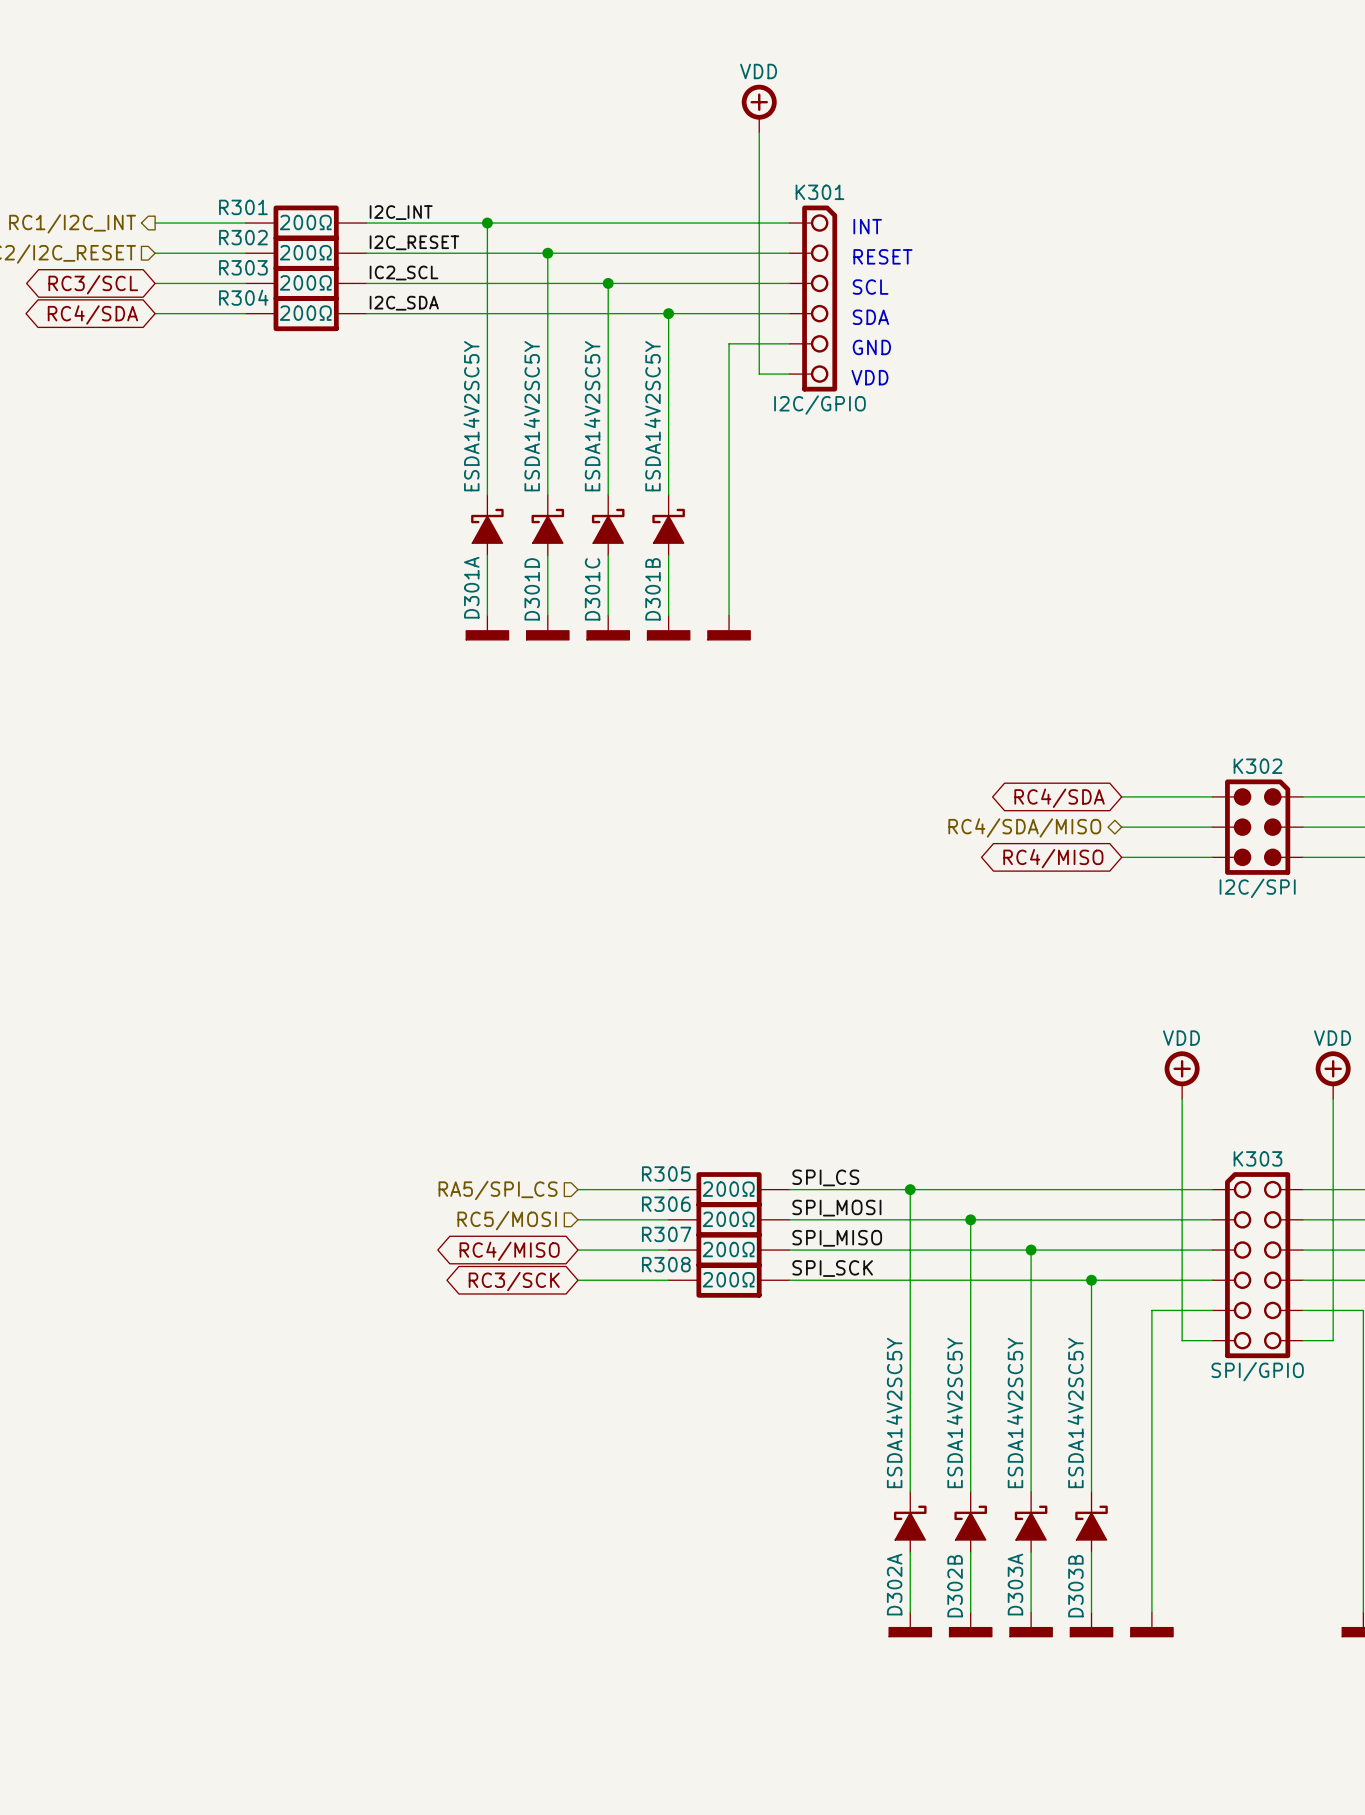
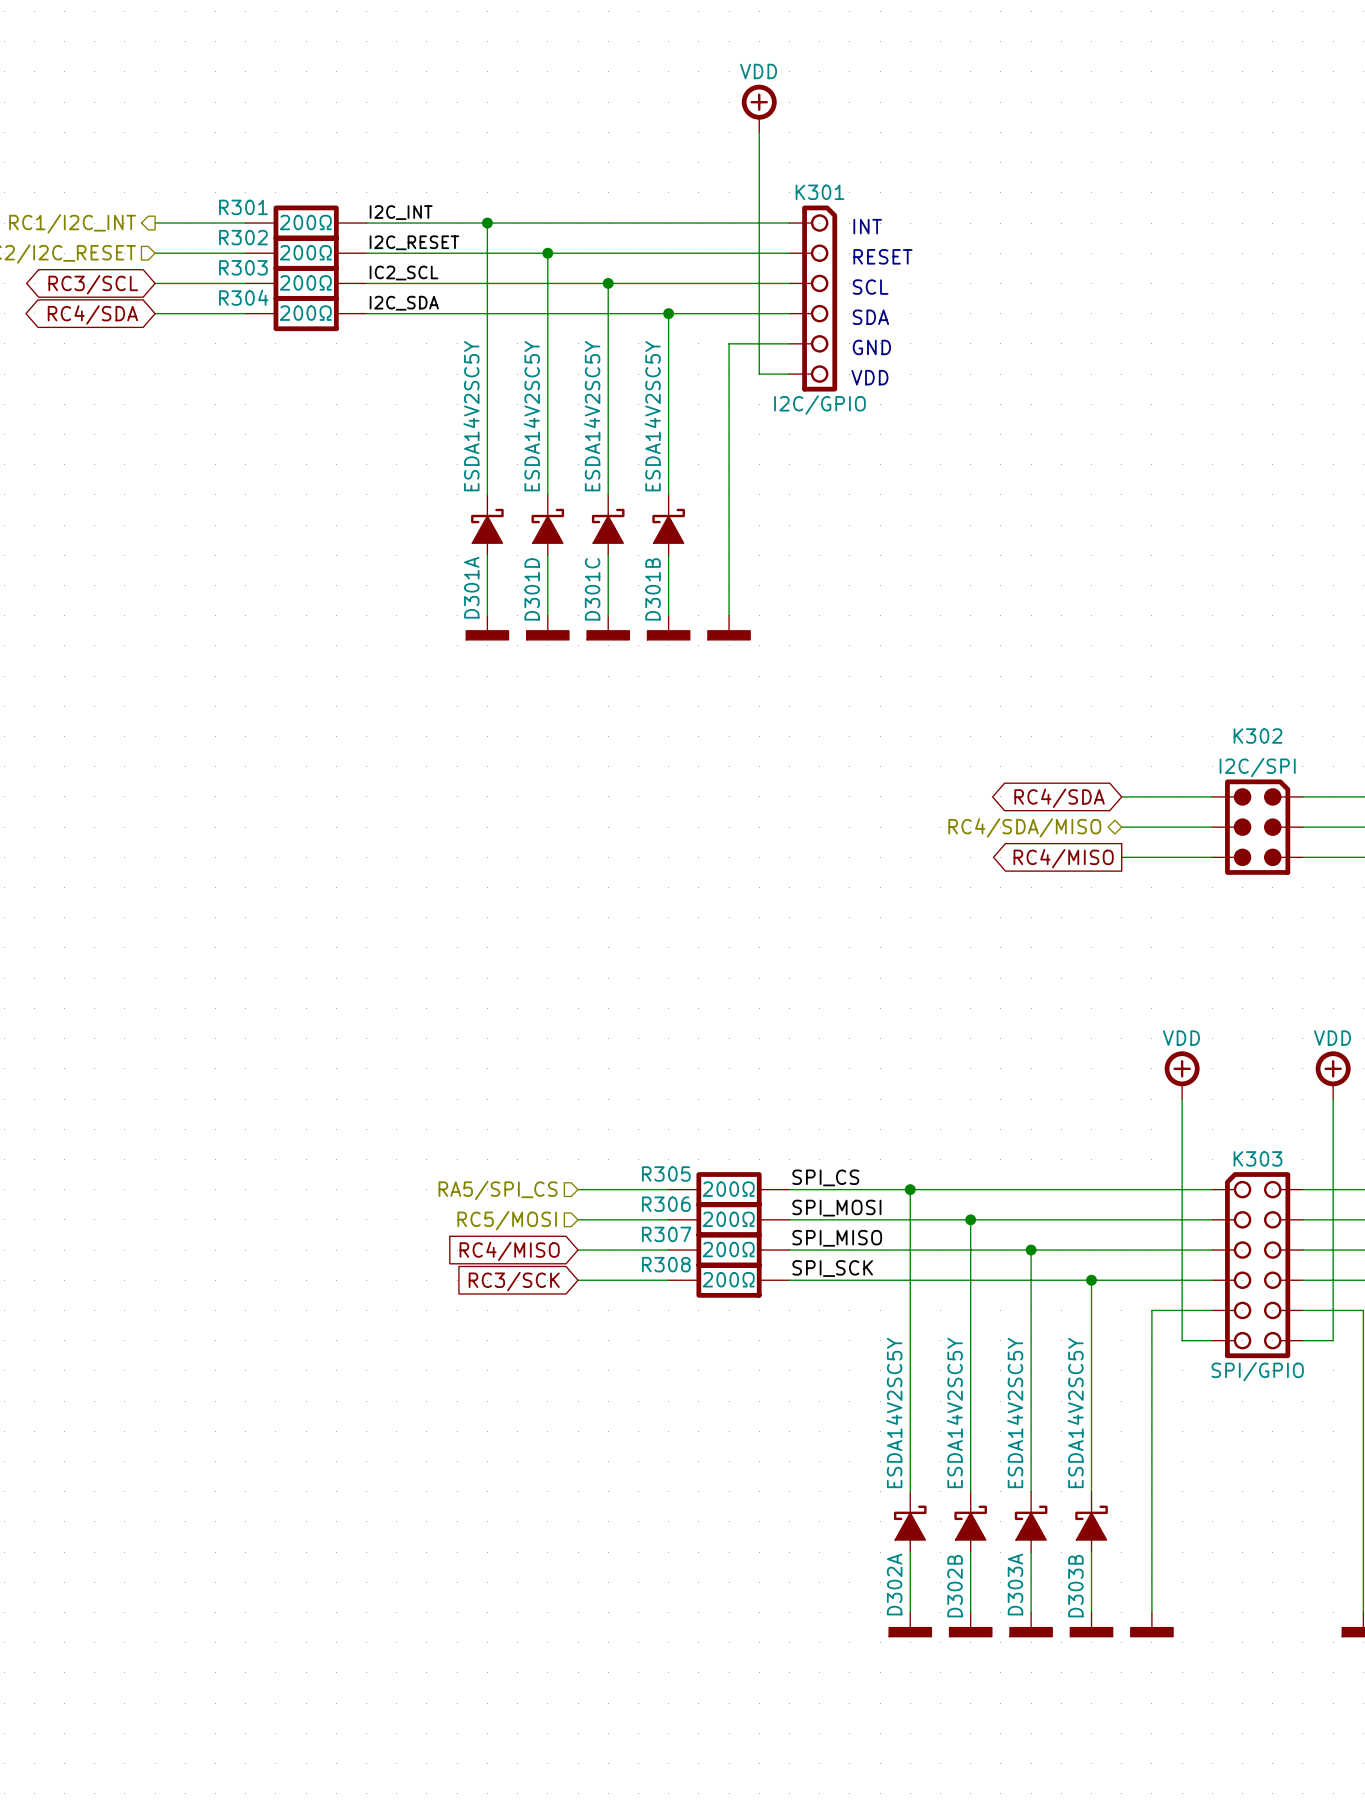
K302 name position: K302 (1257, 766) -> K302 (1257, 736)
global label shape: bidirectional (1053, 858) -> output (1063, 858)
K302 value position: I2C/SPI (1257, 888) -> I2C/SPI (1257, 767)
global label shape: bidirectional (509, 1251) -> input (509, 1251)
global label shape: bidirectional (514, 1281) -> input (514, 1281)

